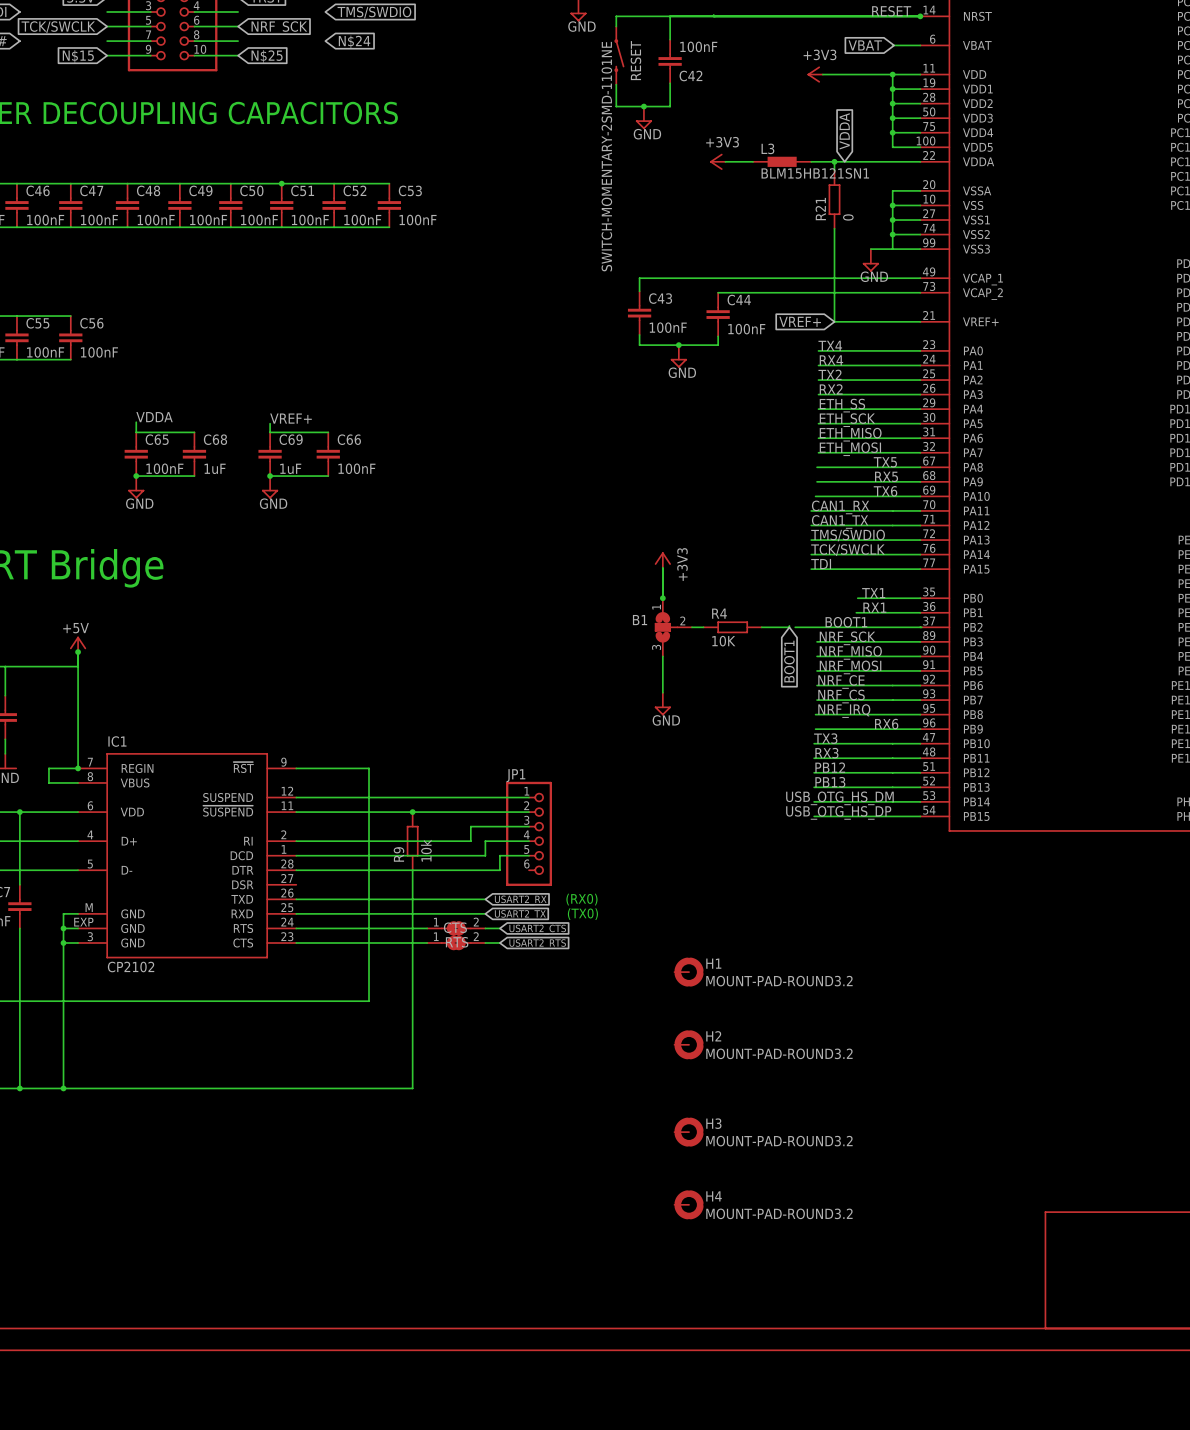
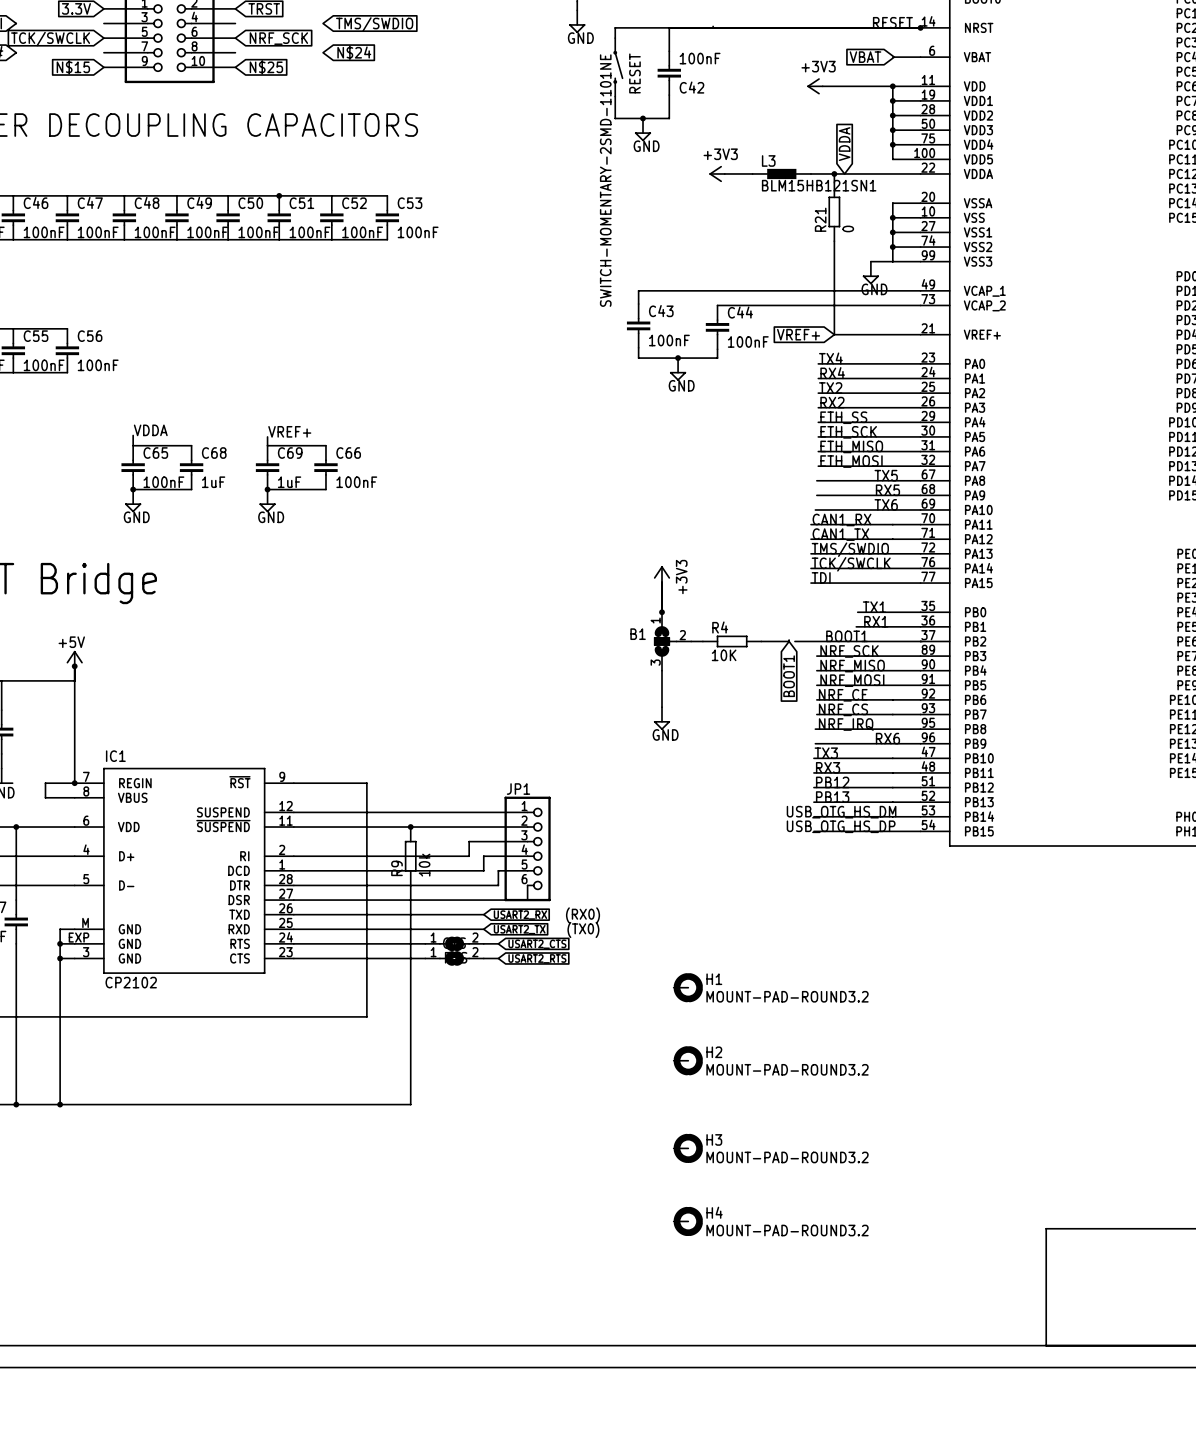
wire: none -> (527, 885) (527, 900) (293, 900)

